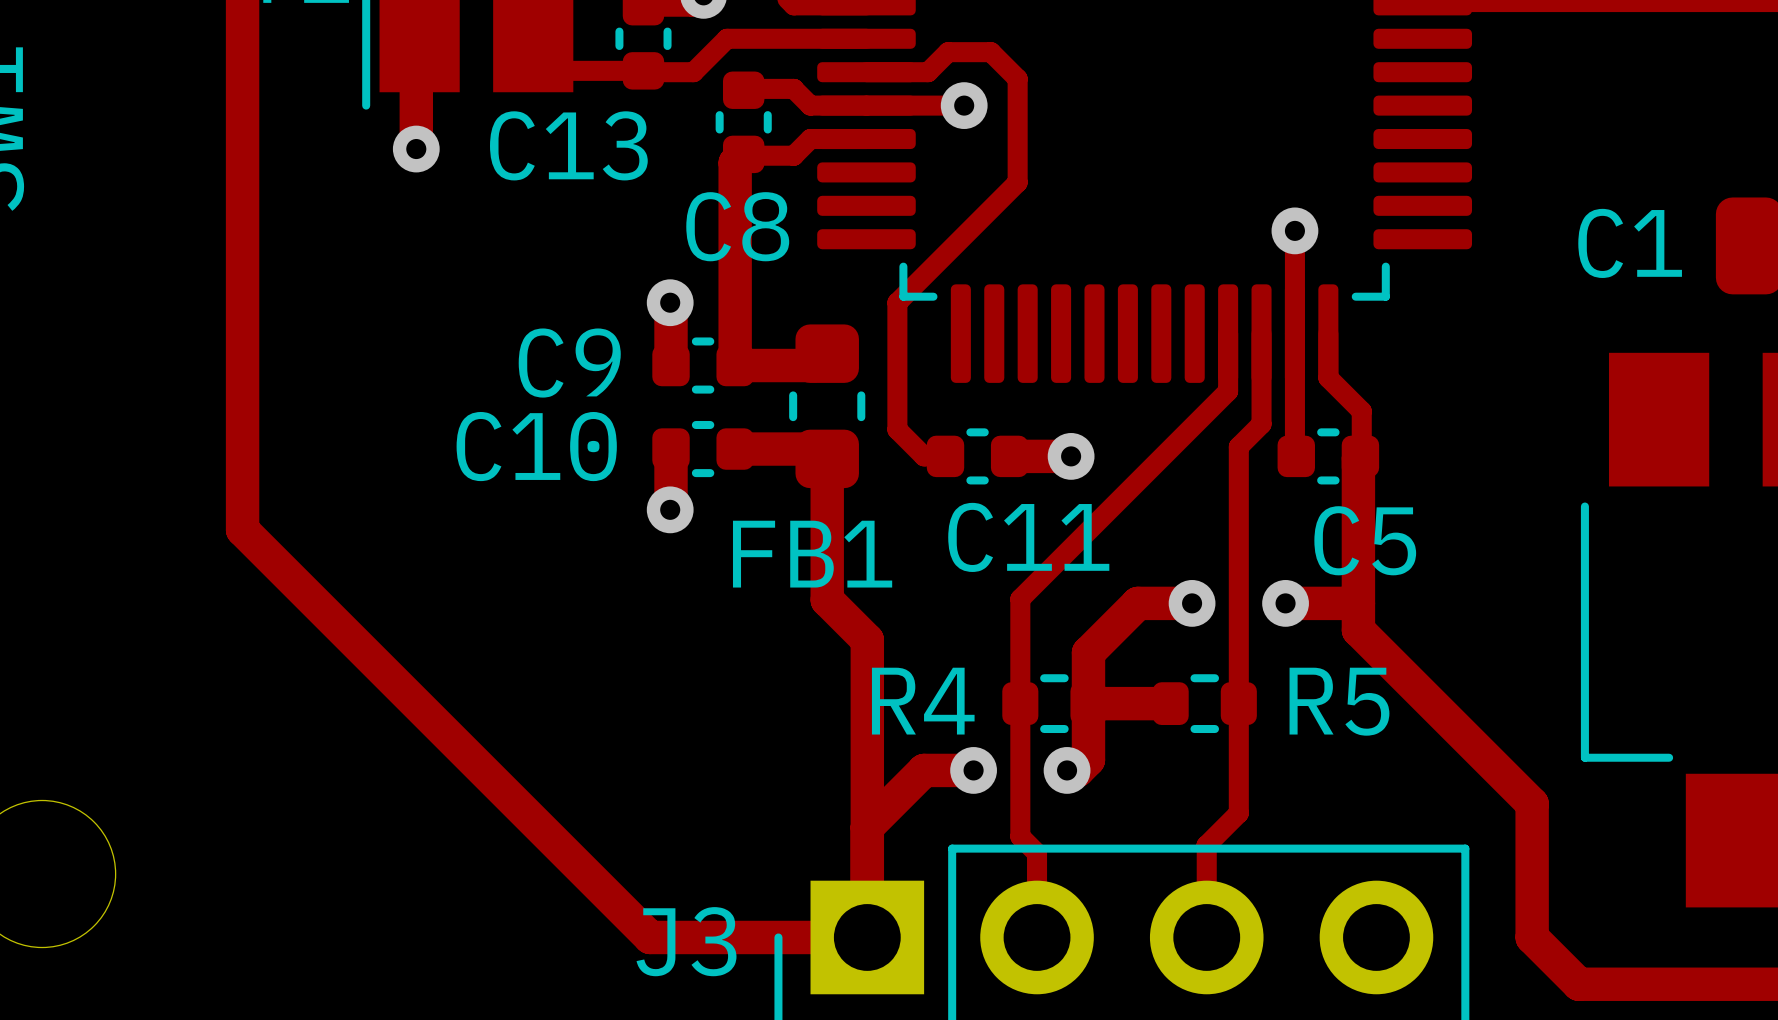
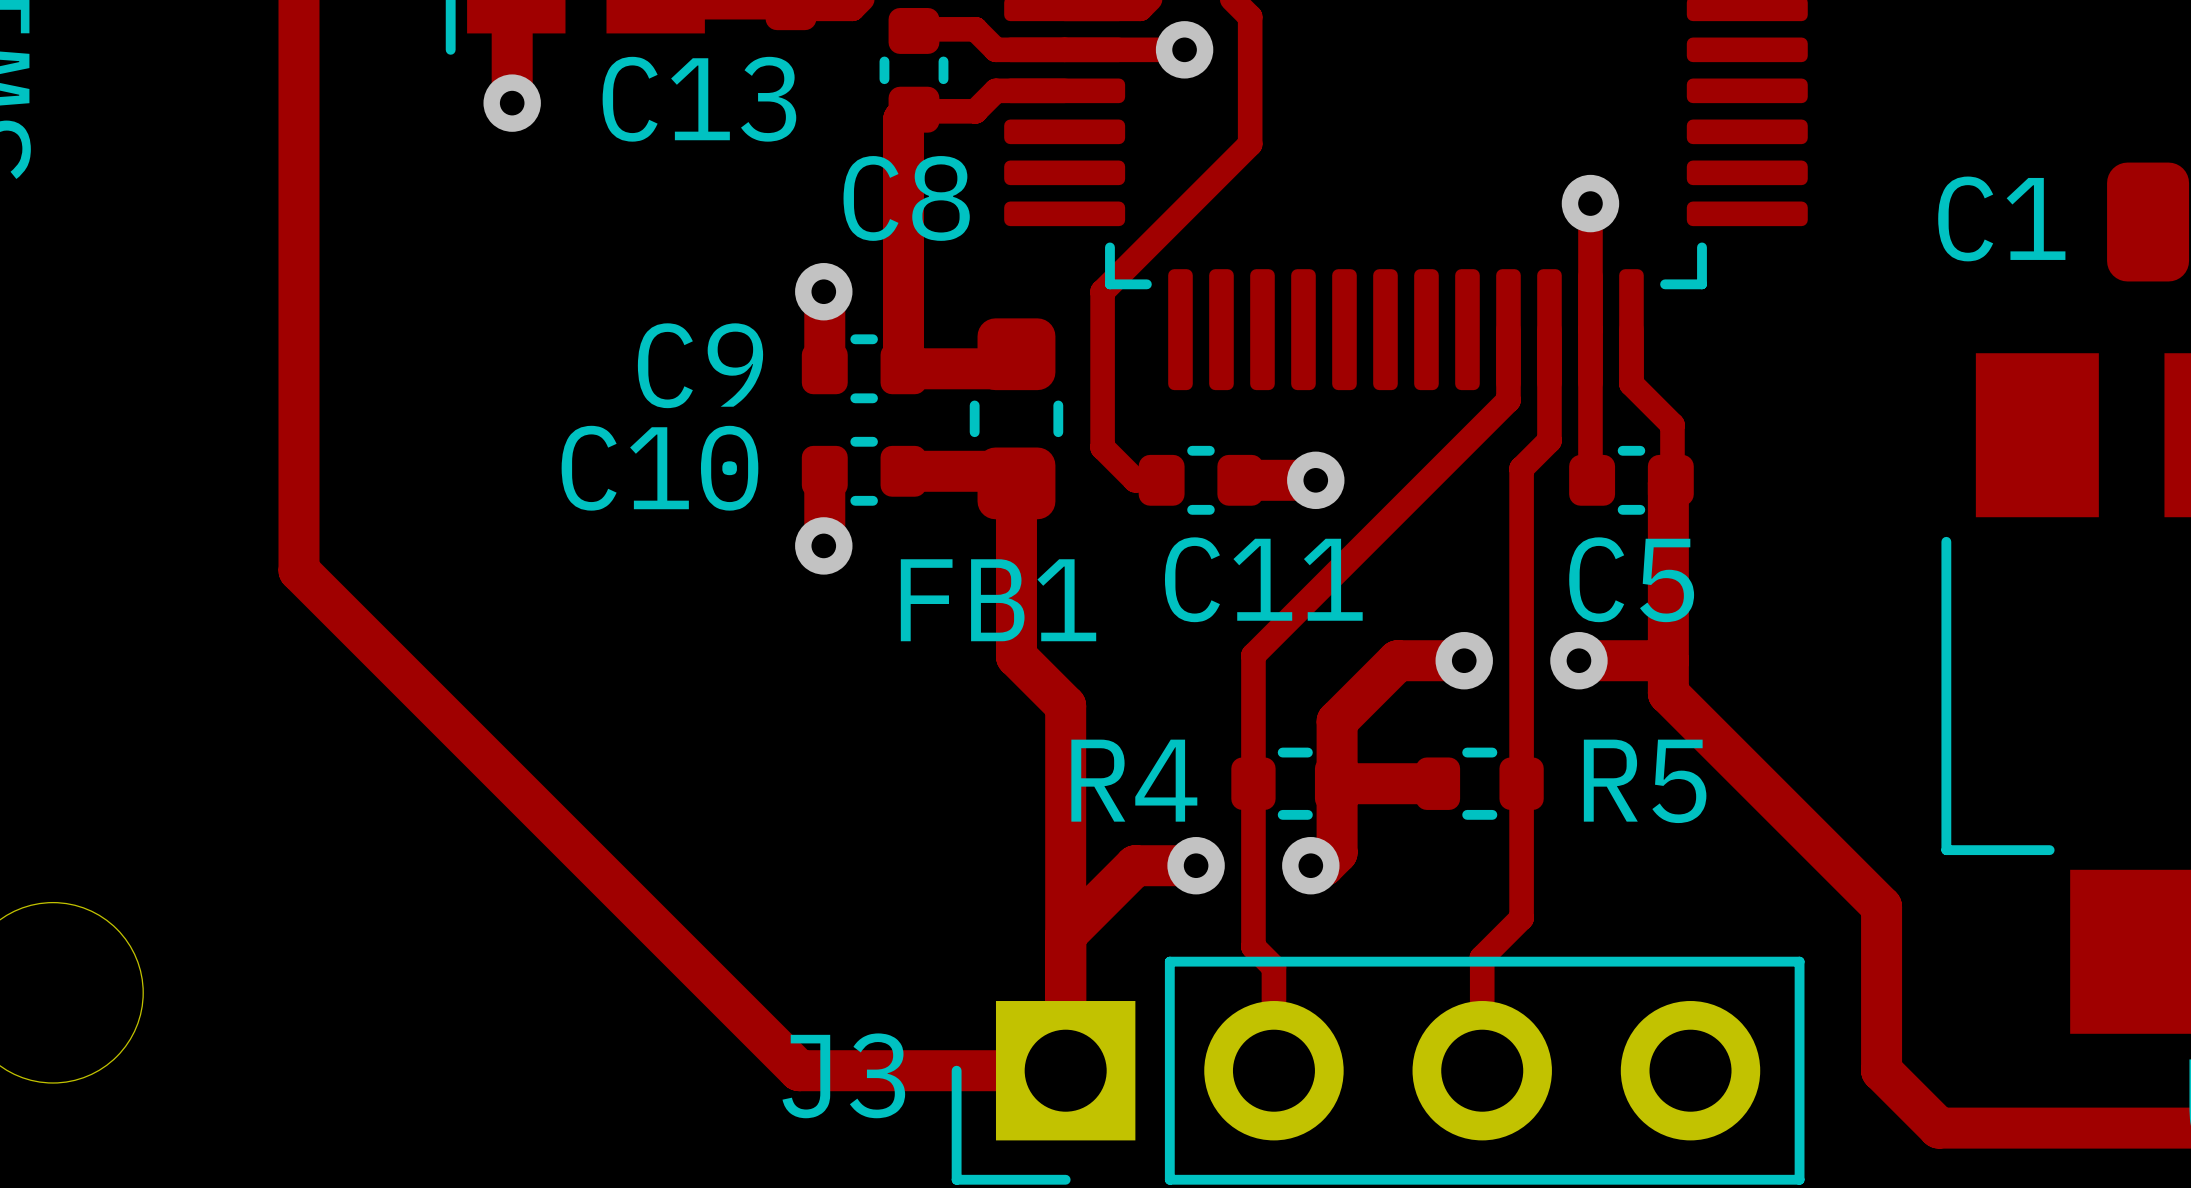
C5 name position: C5 (1365, 540) -> C5 (1631, 579)

